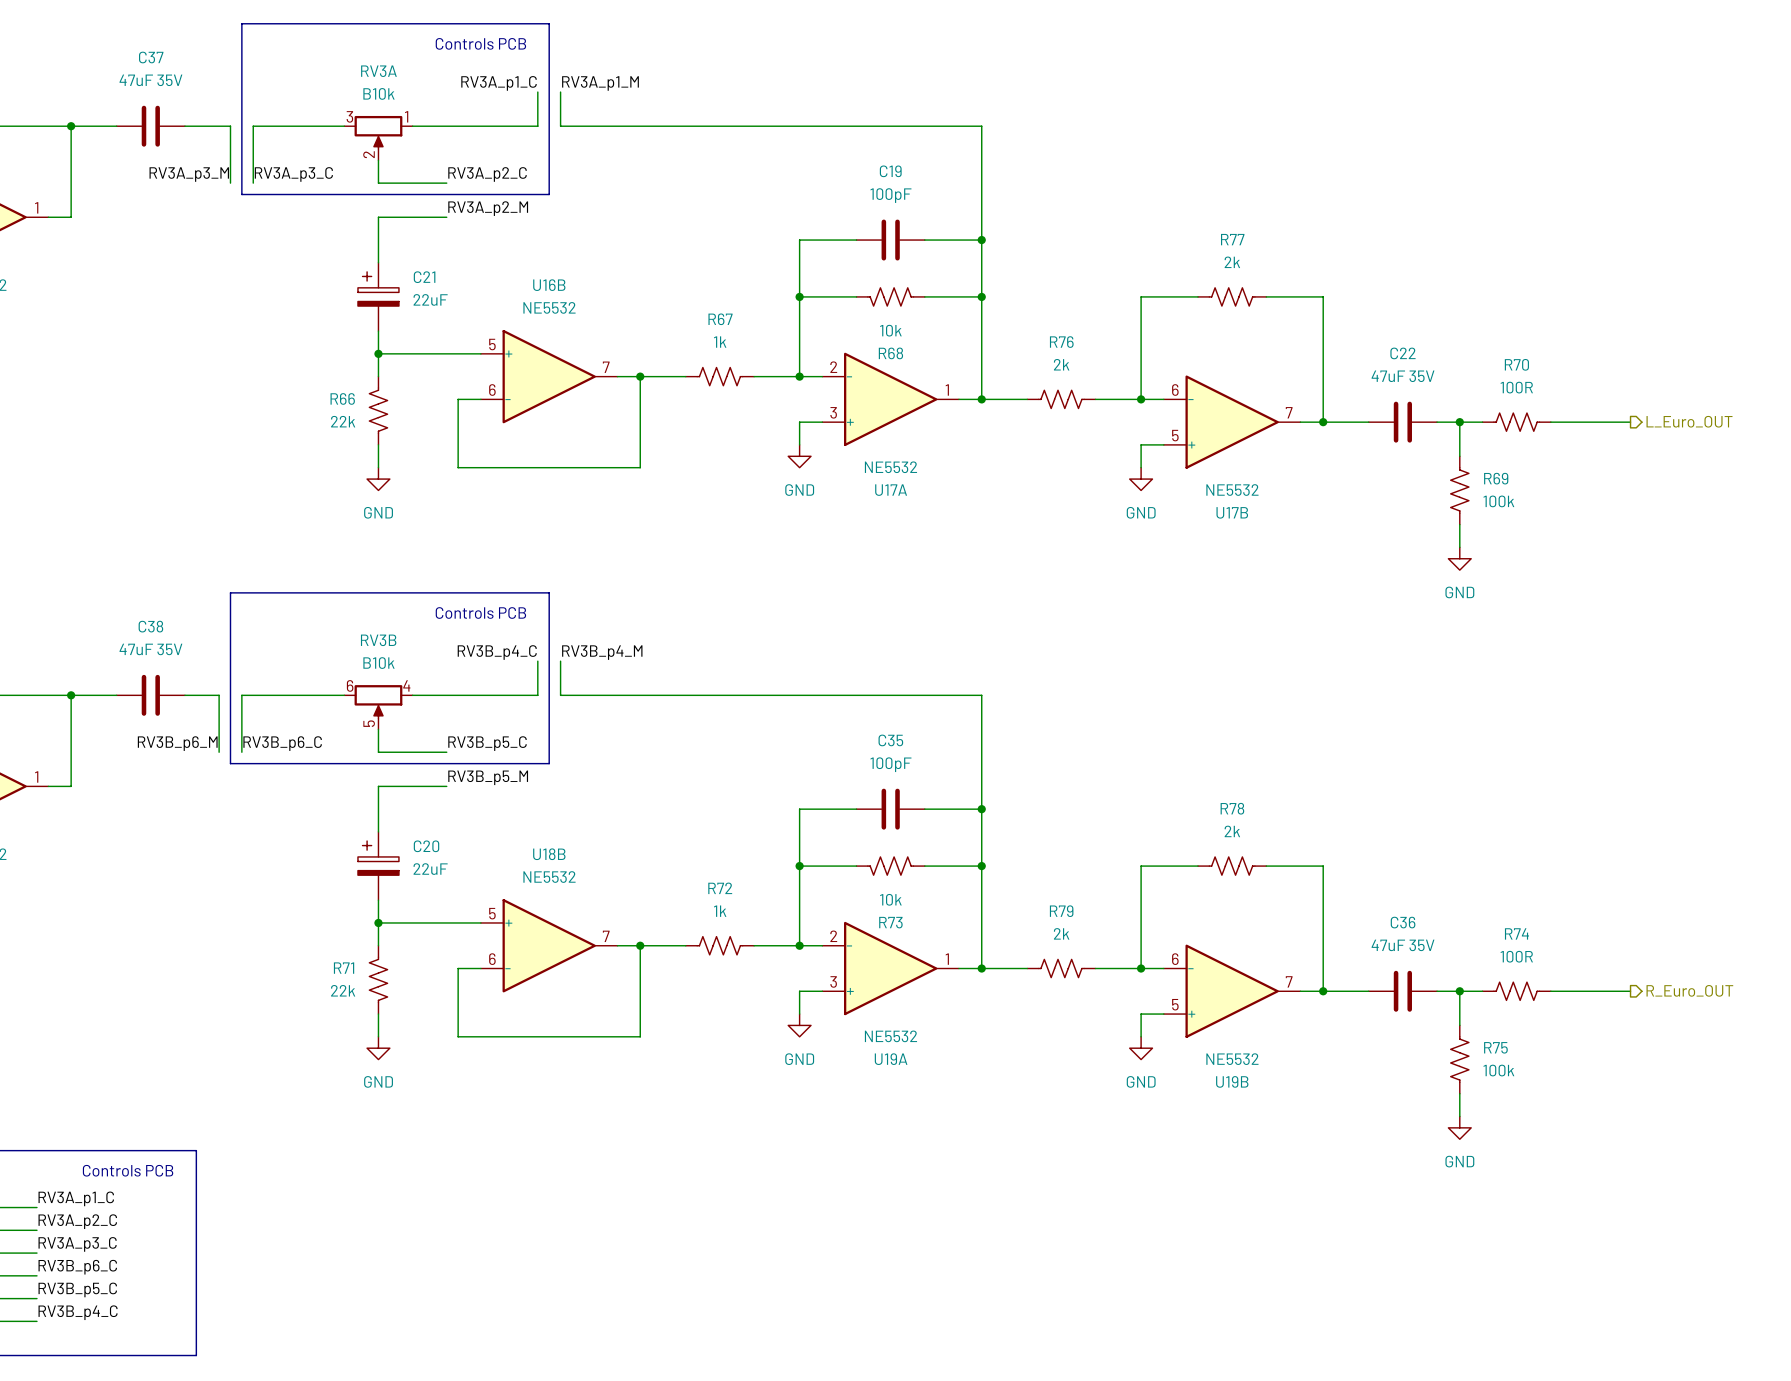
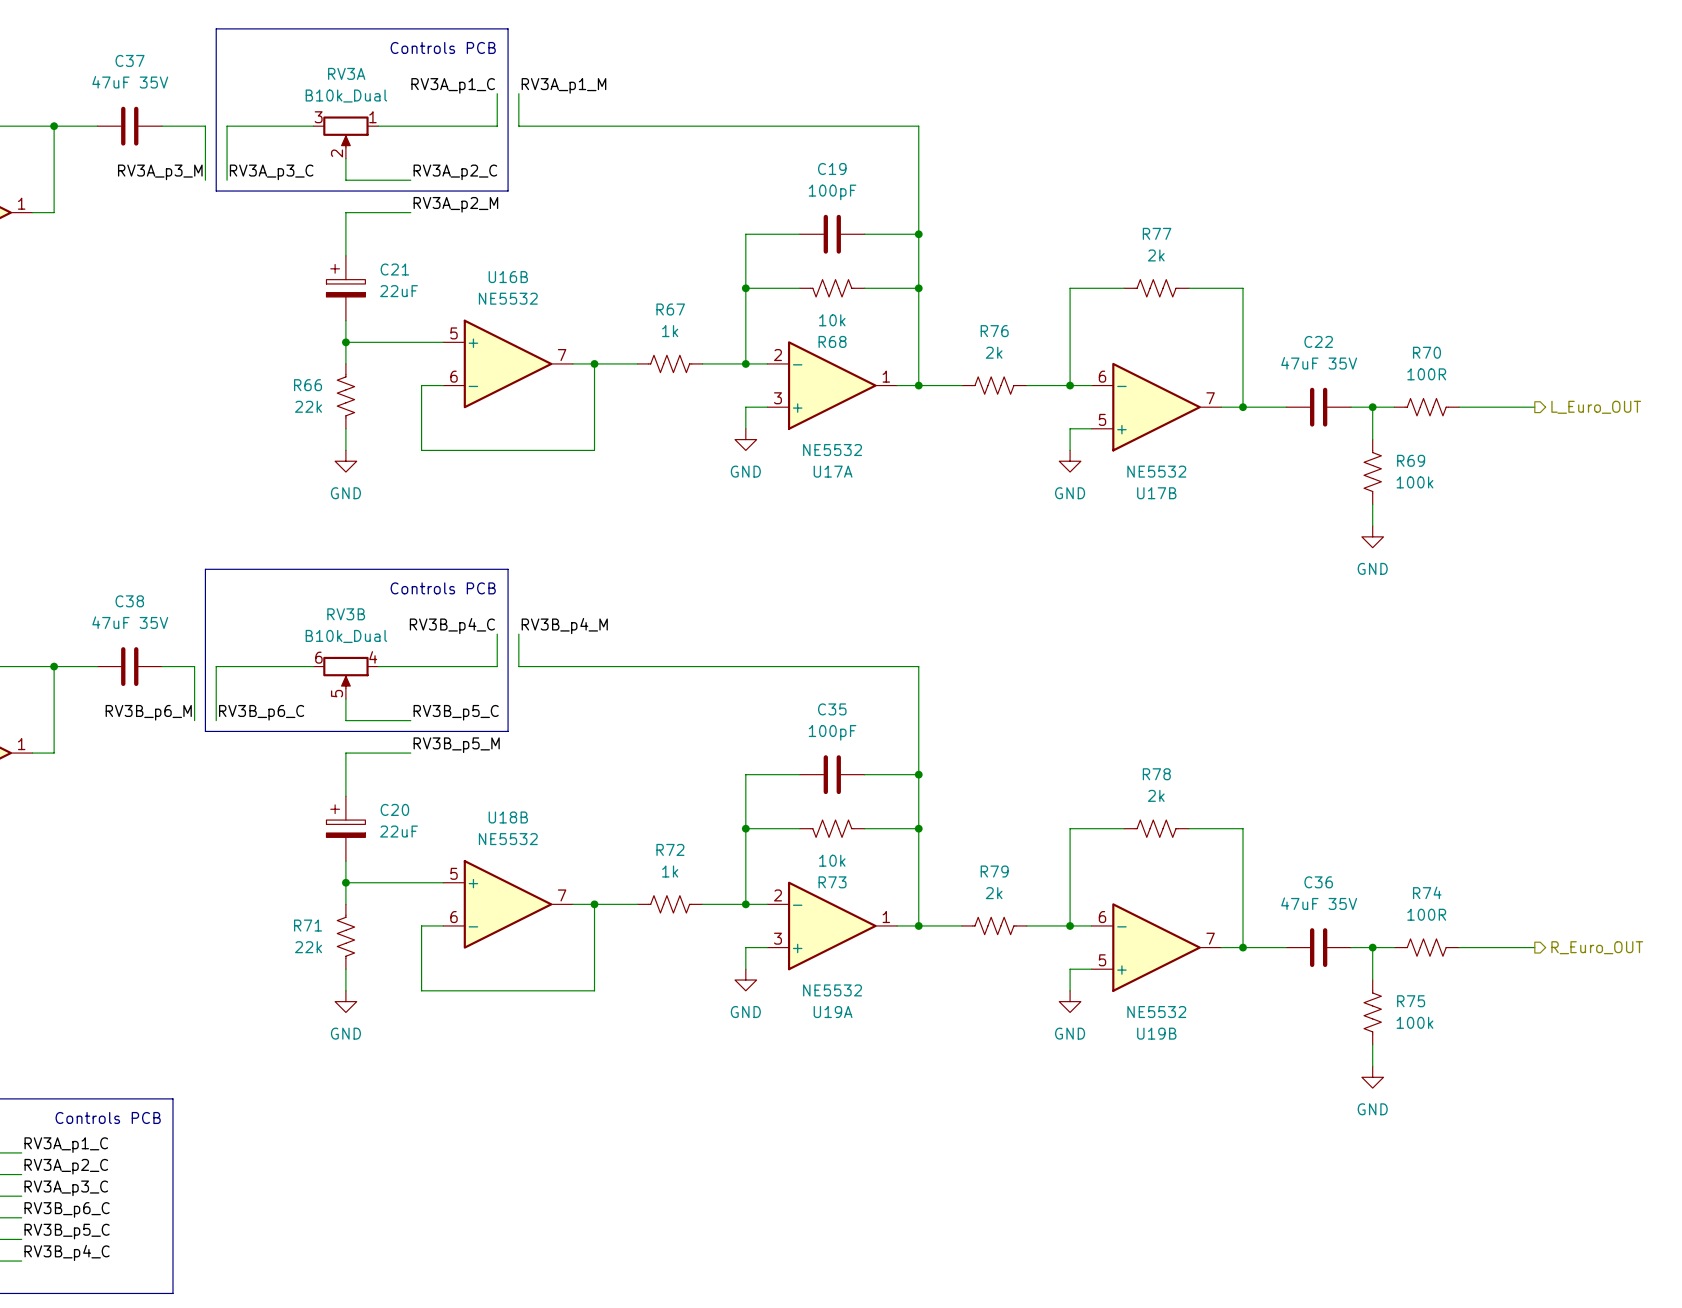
RV3A value: B10k (378, 93) -> B10k_Dual (346, 96)
RV3B value: B10k (378, 663) -> B10k_Dual (346, 636)

